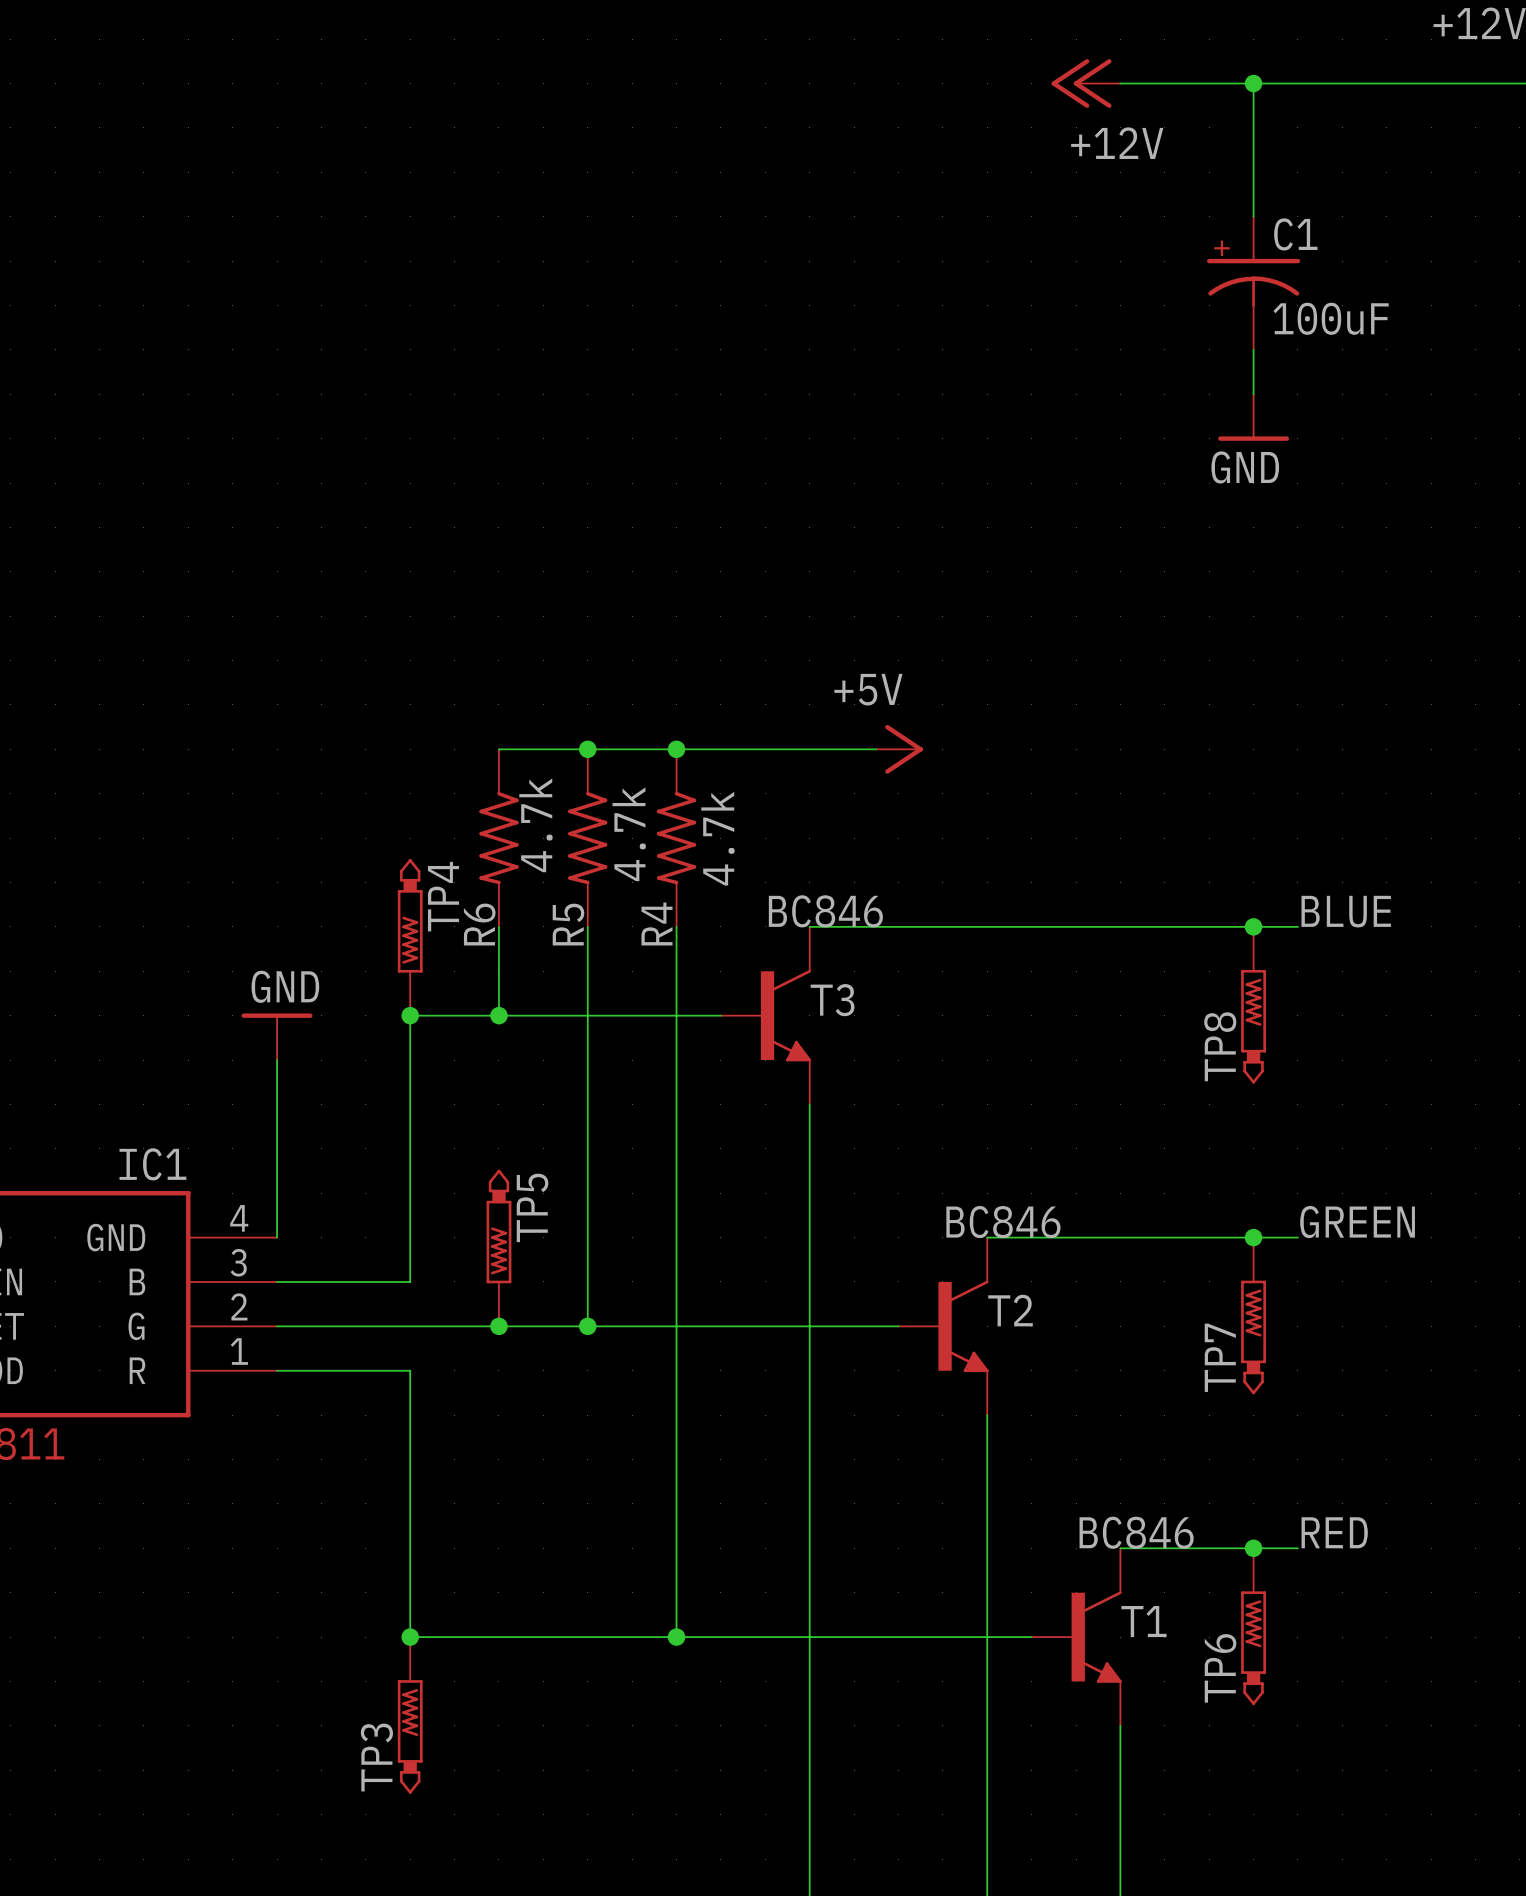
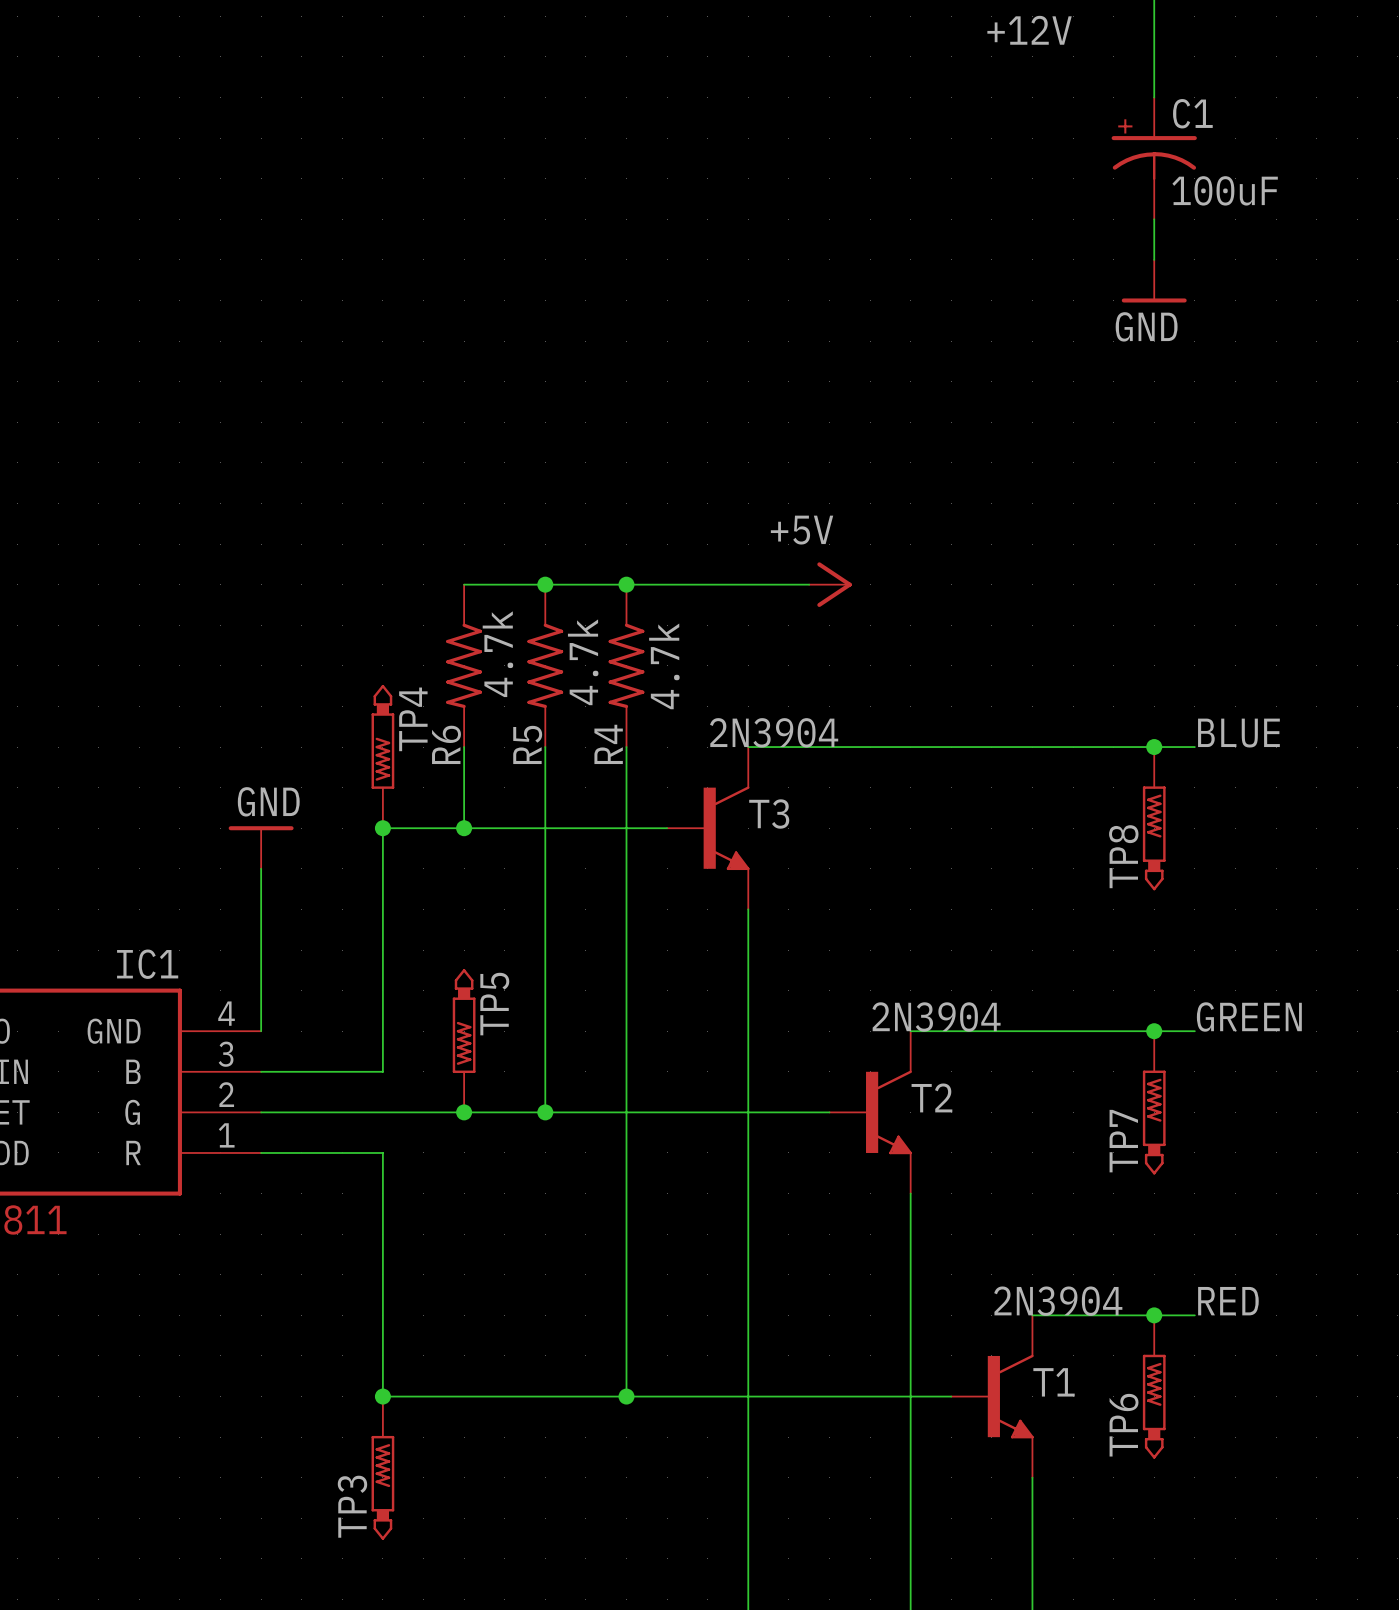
T3 value: BC846 (825, 911) -> 2N3904 (774, 732)
T2 value: BC846 (1003, 1222) -> 2N3904 (936, 1016)
T1 value: BC846 (1136, 1532) -> 2N3904 (1058, 1301)

